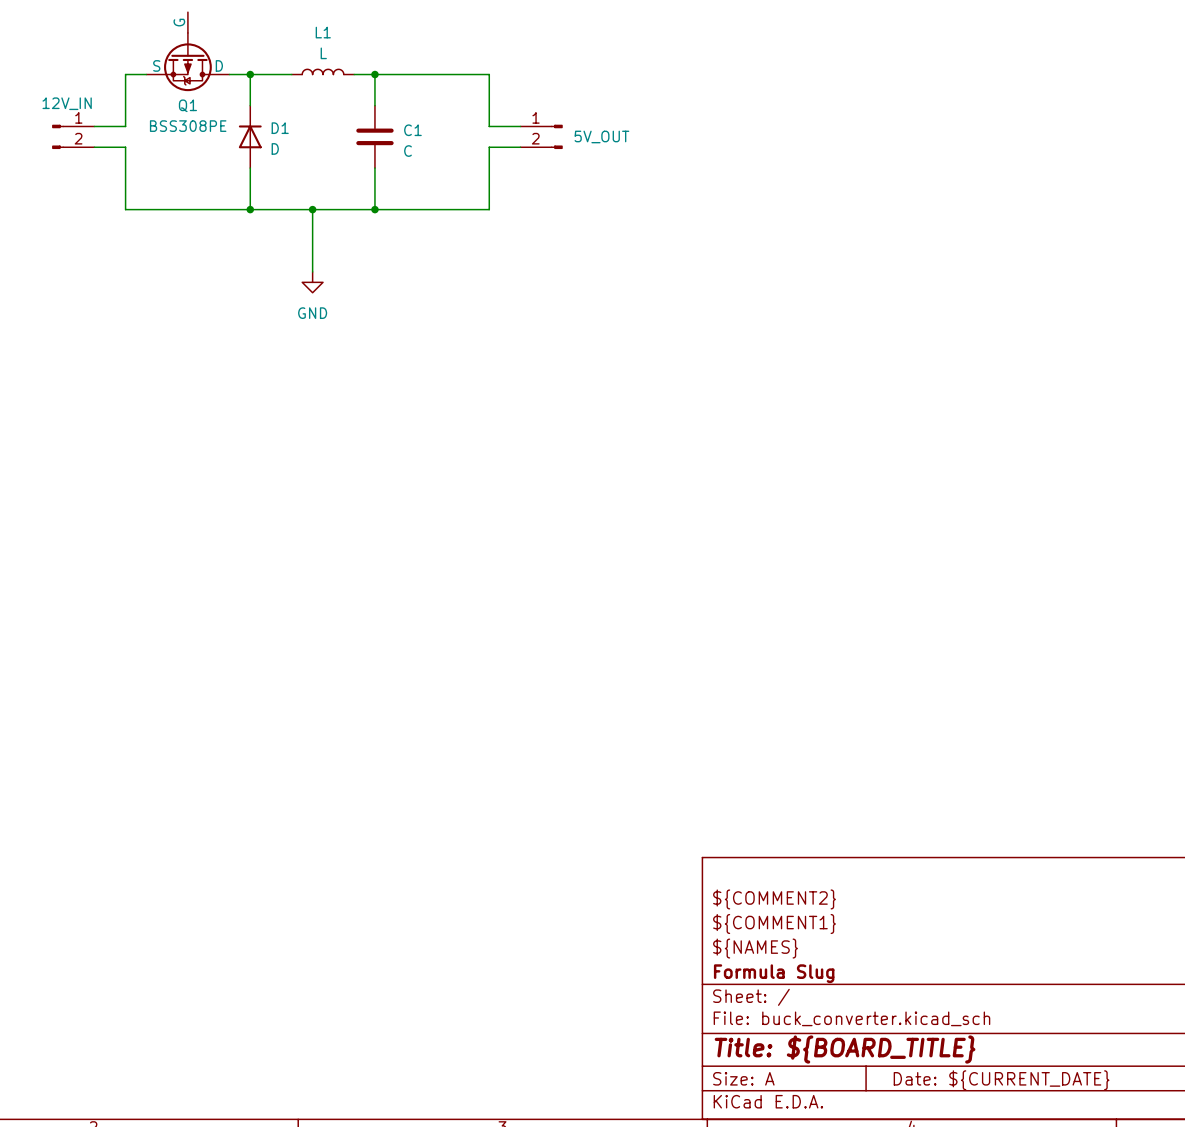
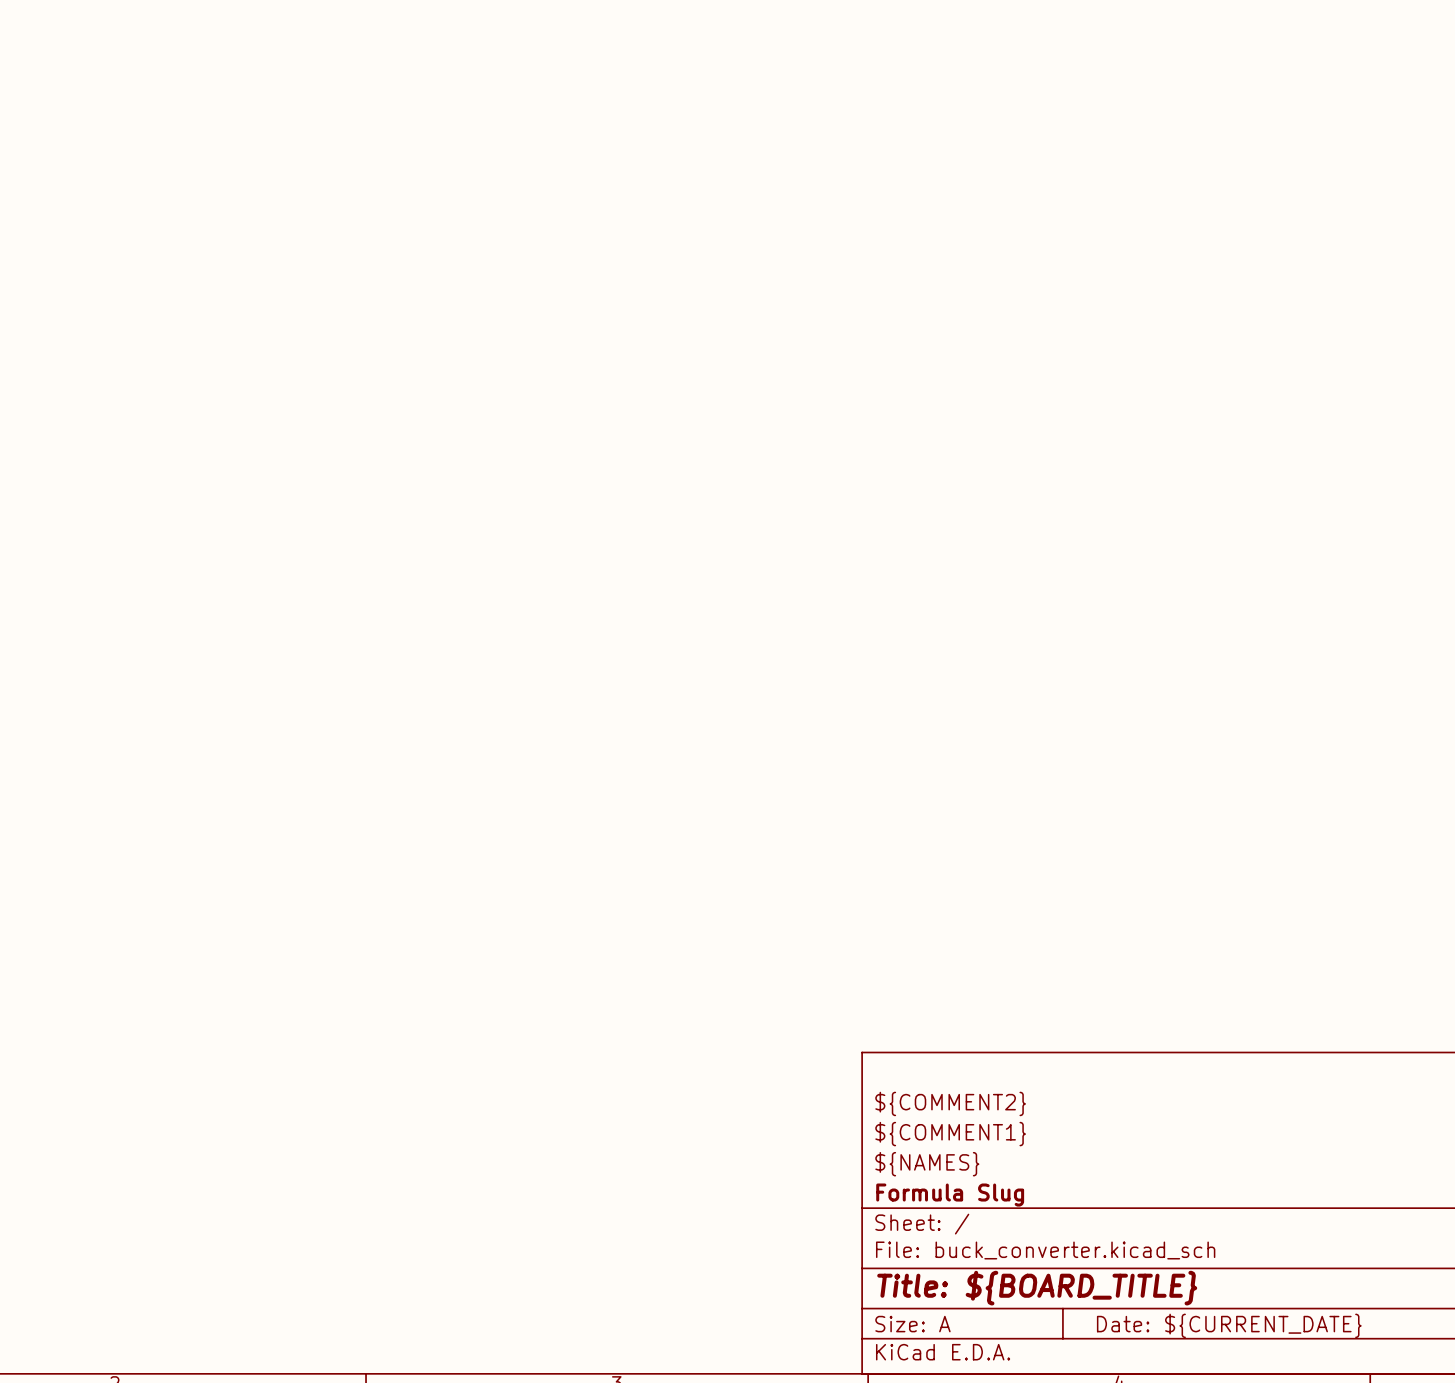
Q1: BSS308PE (187, 51) -> none
L1: L (323, 71) -> none
wire: (146, 74) (125, 74) (125, 126) (94, 126) -> none
wire: (229, 74) (291, 74) -> none
wire: (250, 74) (250, 105) -> none
junction: (250, 74) -> none
wire: (354, 74) (489, 74) (489, 126) (520, 126) -> none
wire: (374, 74) (374, 105) -> none
junction: (374, 74) -> none
12V_IN: (73, 136) -> none
D1: D (250, 136) -> none
C1: C (374, 136) -> none
5V_OUT: (541, 136) -> none
wire: (94, 147) (125, 147) (125, 209) (489, 209) (489, 147) (520, 147) -> none
wire: (250, 168) (250, 209) -> none
wire: (374, 168) (374, 209) -> none
junction: (250, 209) -> none
wire: (312, 209) (312, 271) -> none
junction: (312, 209) -> none
junction: (374, 209) -> none
power symbol: GND (312, 282) -> none

